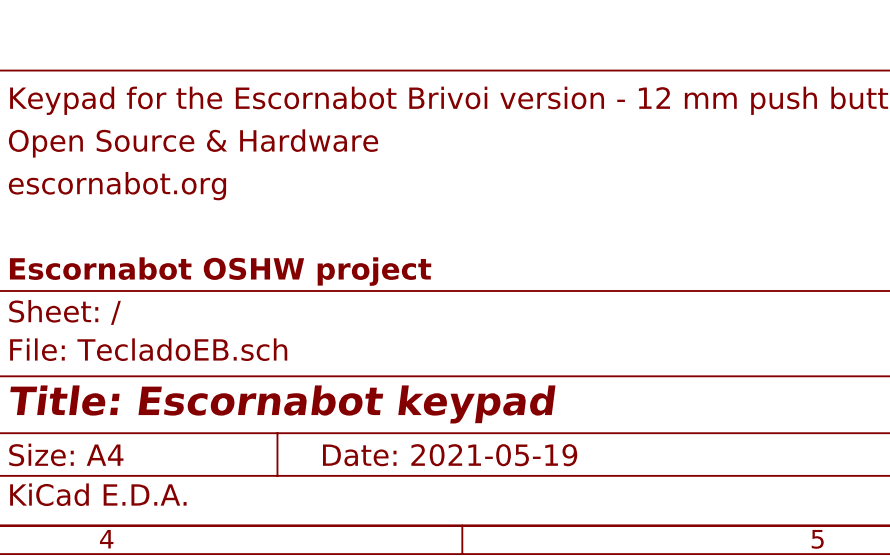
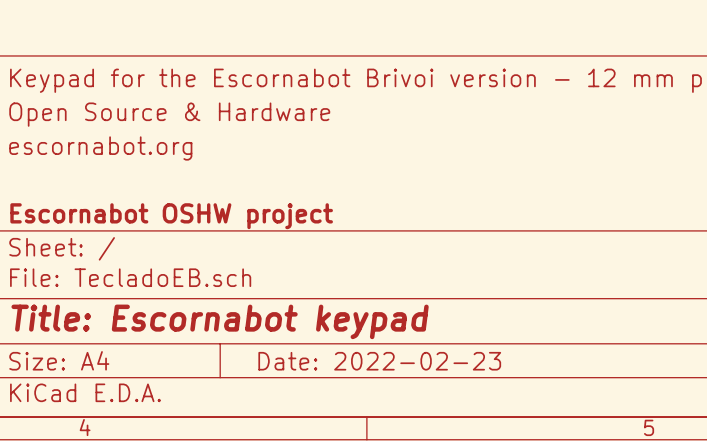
title block: Date: 2021-05-19 (450, 455) -> Date: 2022-02-23 (379, 361)

